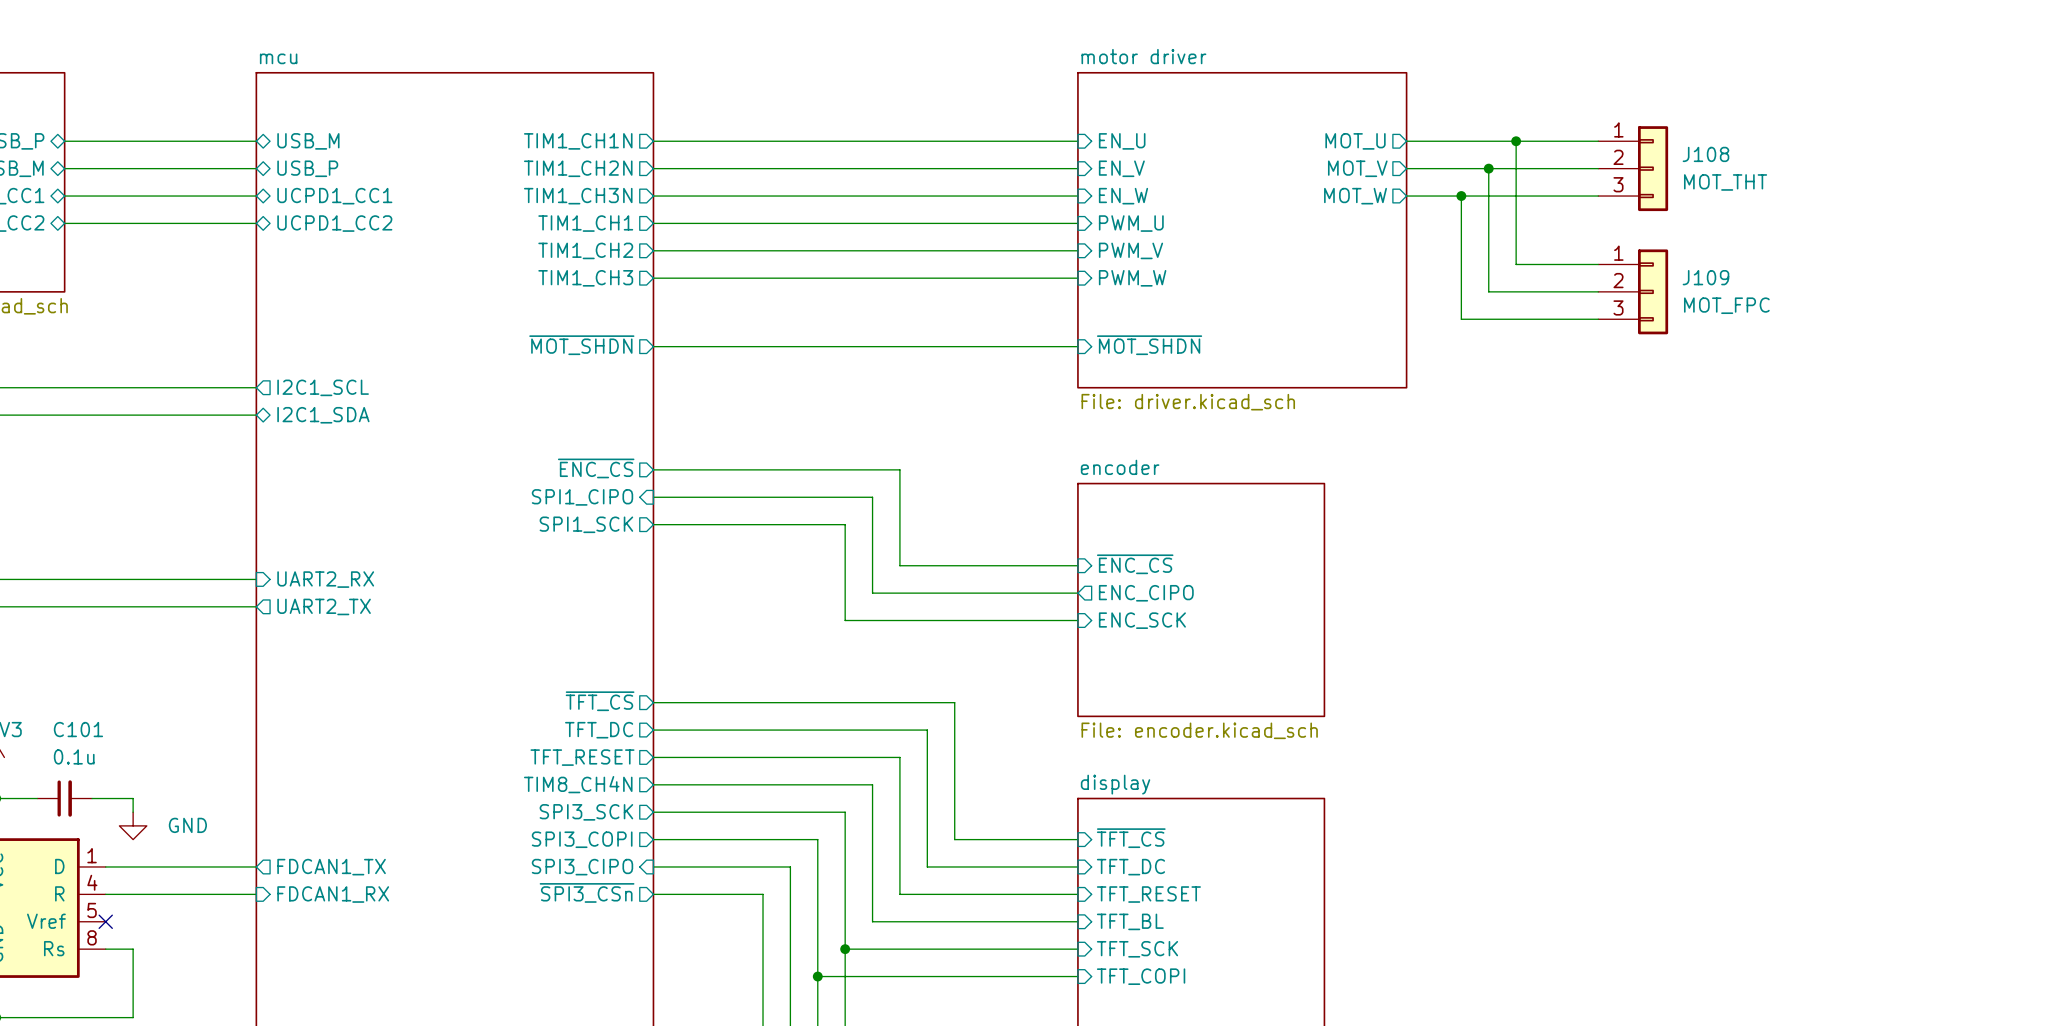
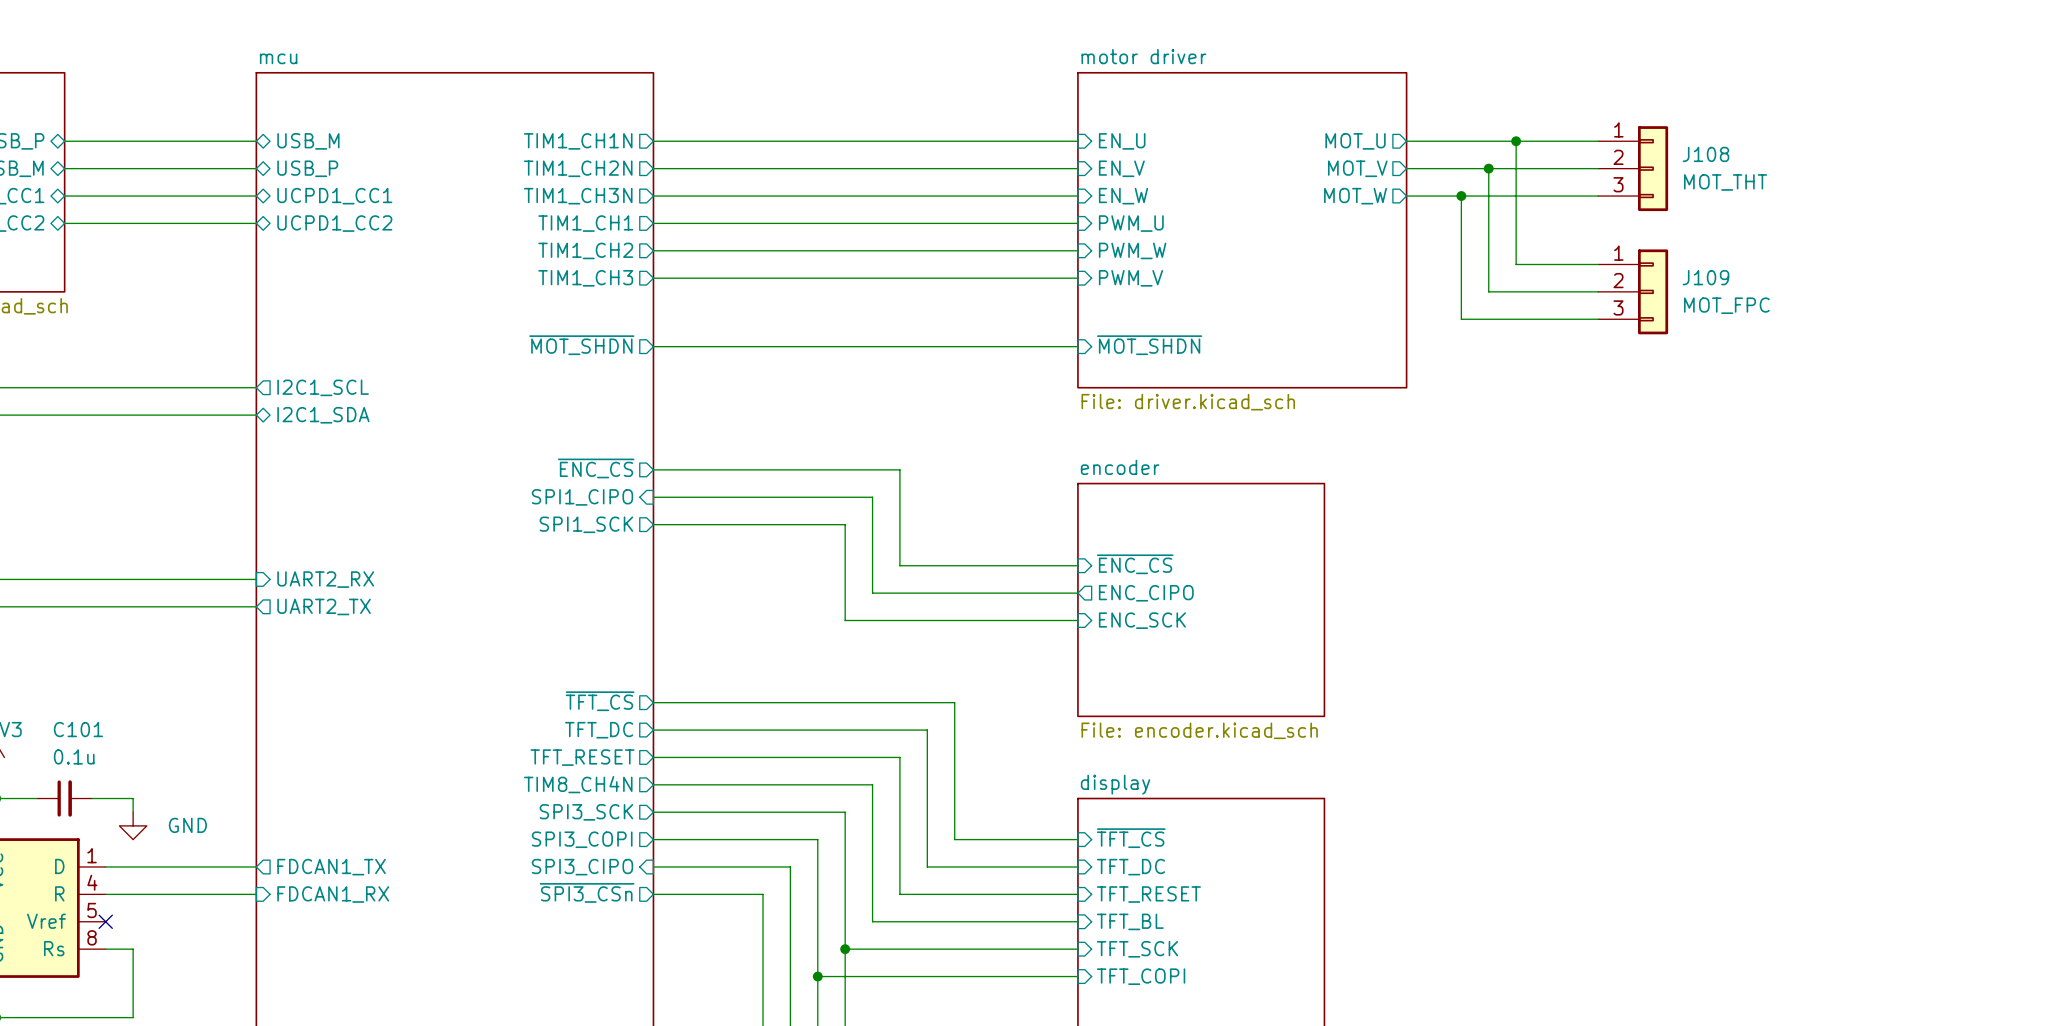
sheet pin: PWM_V (1130, 250) -> PWM_W (1132, 250)
sheet pin: PWM_W (1132, 278) -> PWM_V (1130, 278)

